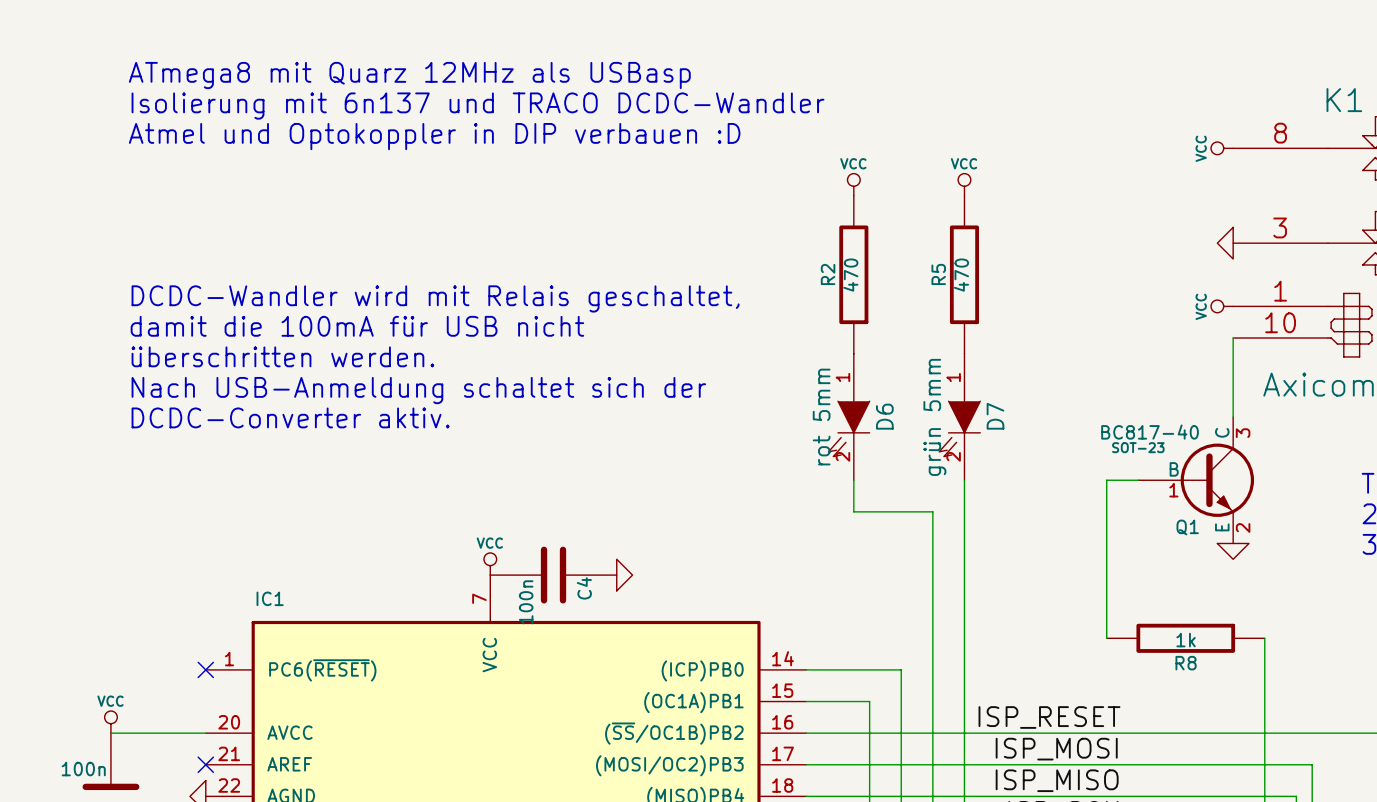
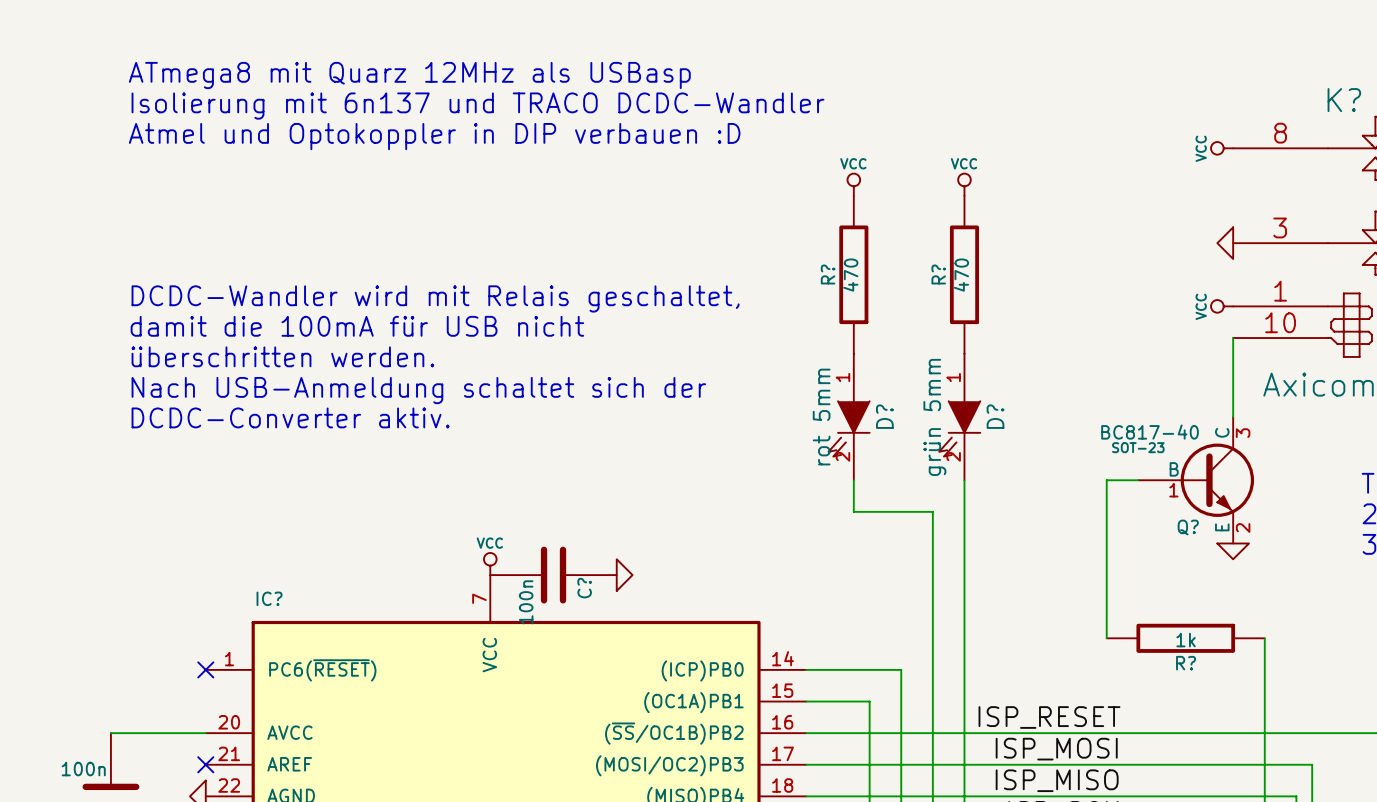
K1 name: K1 (1344, 100) -> K? (1344, 100)
R2 name: R2 (828, 274) -> R? (828, 274)
R5 name: R5 (938, 274) -> R? (938, 274)
D6 name: D6 (884, 416) -> D? (884, 416)
D7 name: D7 (995, 416) -> D? (995, 416)
Q1 name: Q1 (1187, 527) -> Q? (1188, 527)
C4 name: C4 (584, 588) -> C? (584, 588)
IC1 name: IC1 (270, 598) -> IC? (269, 598)
R8 name: R8 (1186, 663) -> R? (1186, 663)
power symbol: VCC (110, 722) -> none

